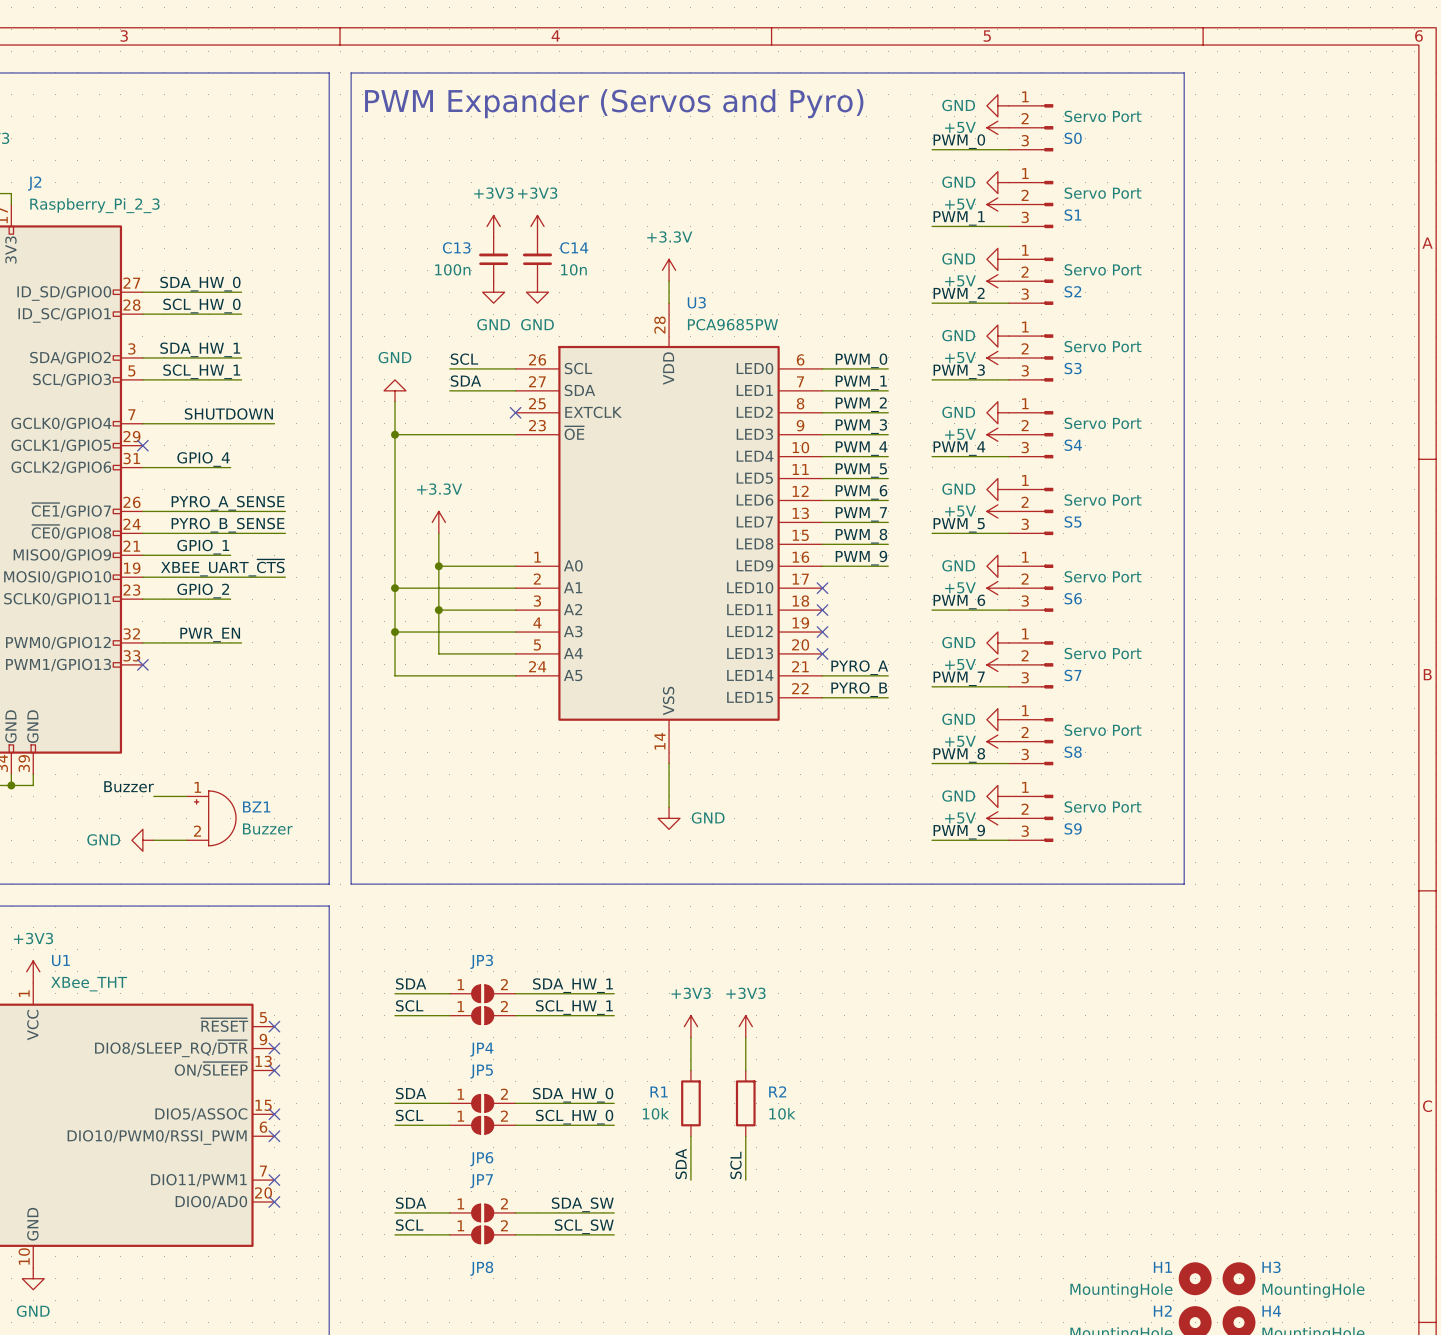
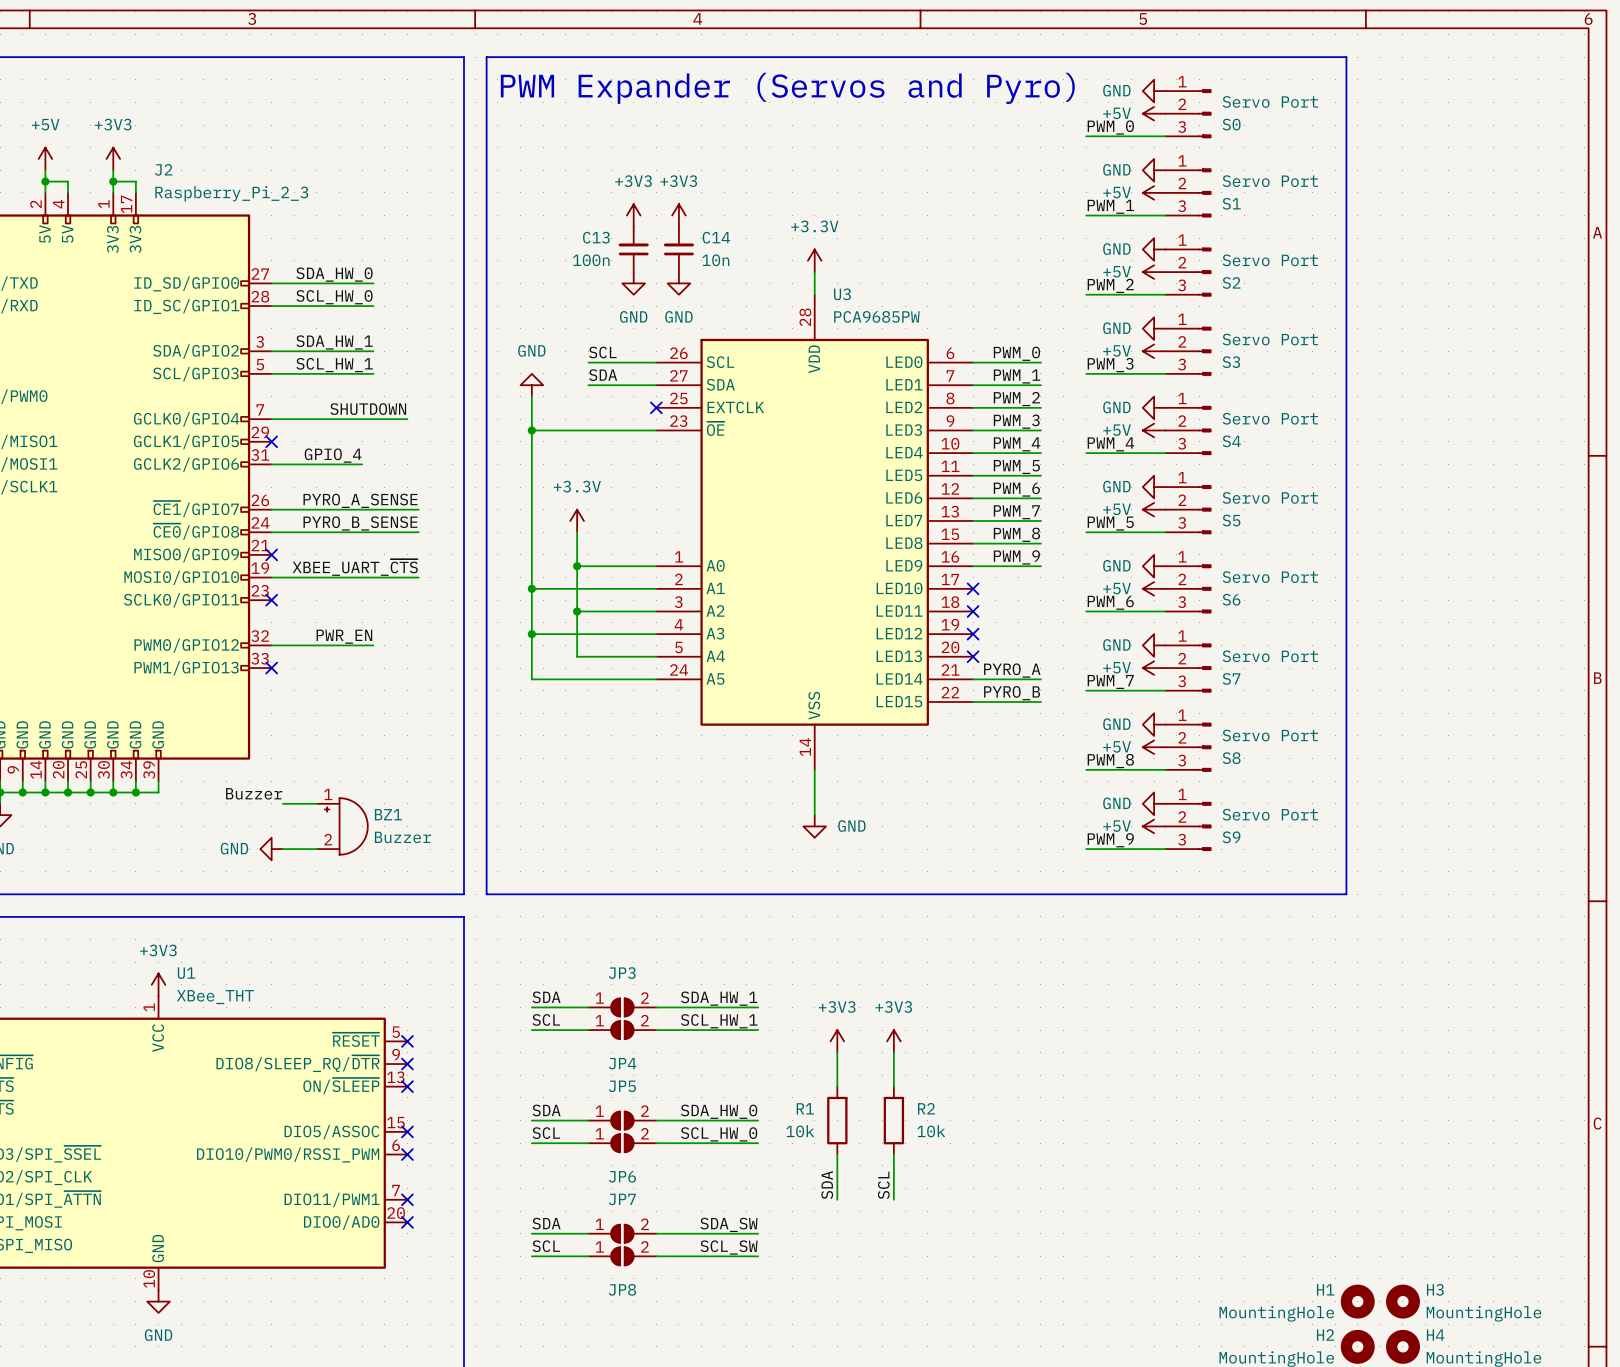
label: GPIO_1 (203, 547) -> none
wire: (142, 555) (230, 555) -> none
no-connect mark: none -> (271, 554)
label: GPIO_2 (203, 591) -> none
wire: (142, 599) (230, 599) -> none
no-connect mark: none -> (271, 600)

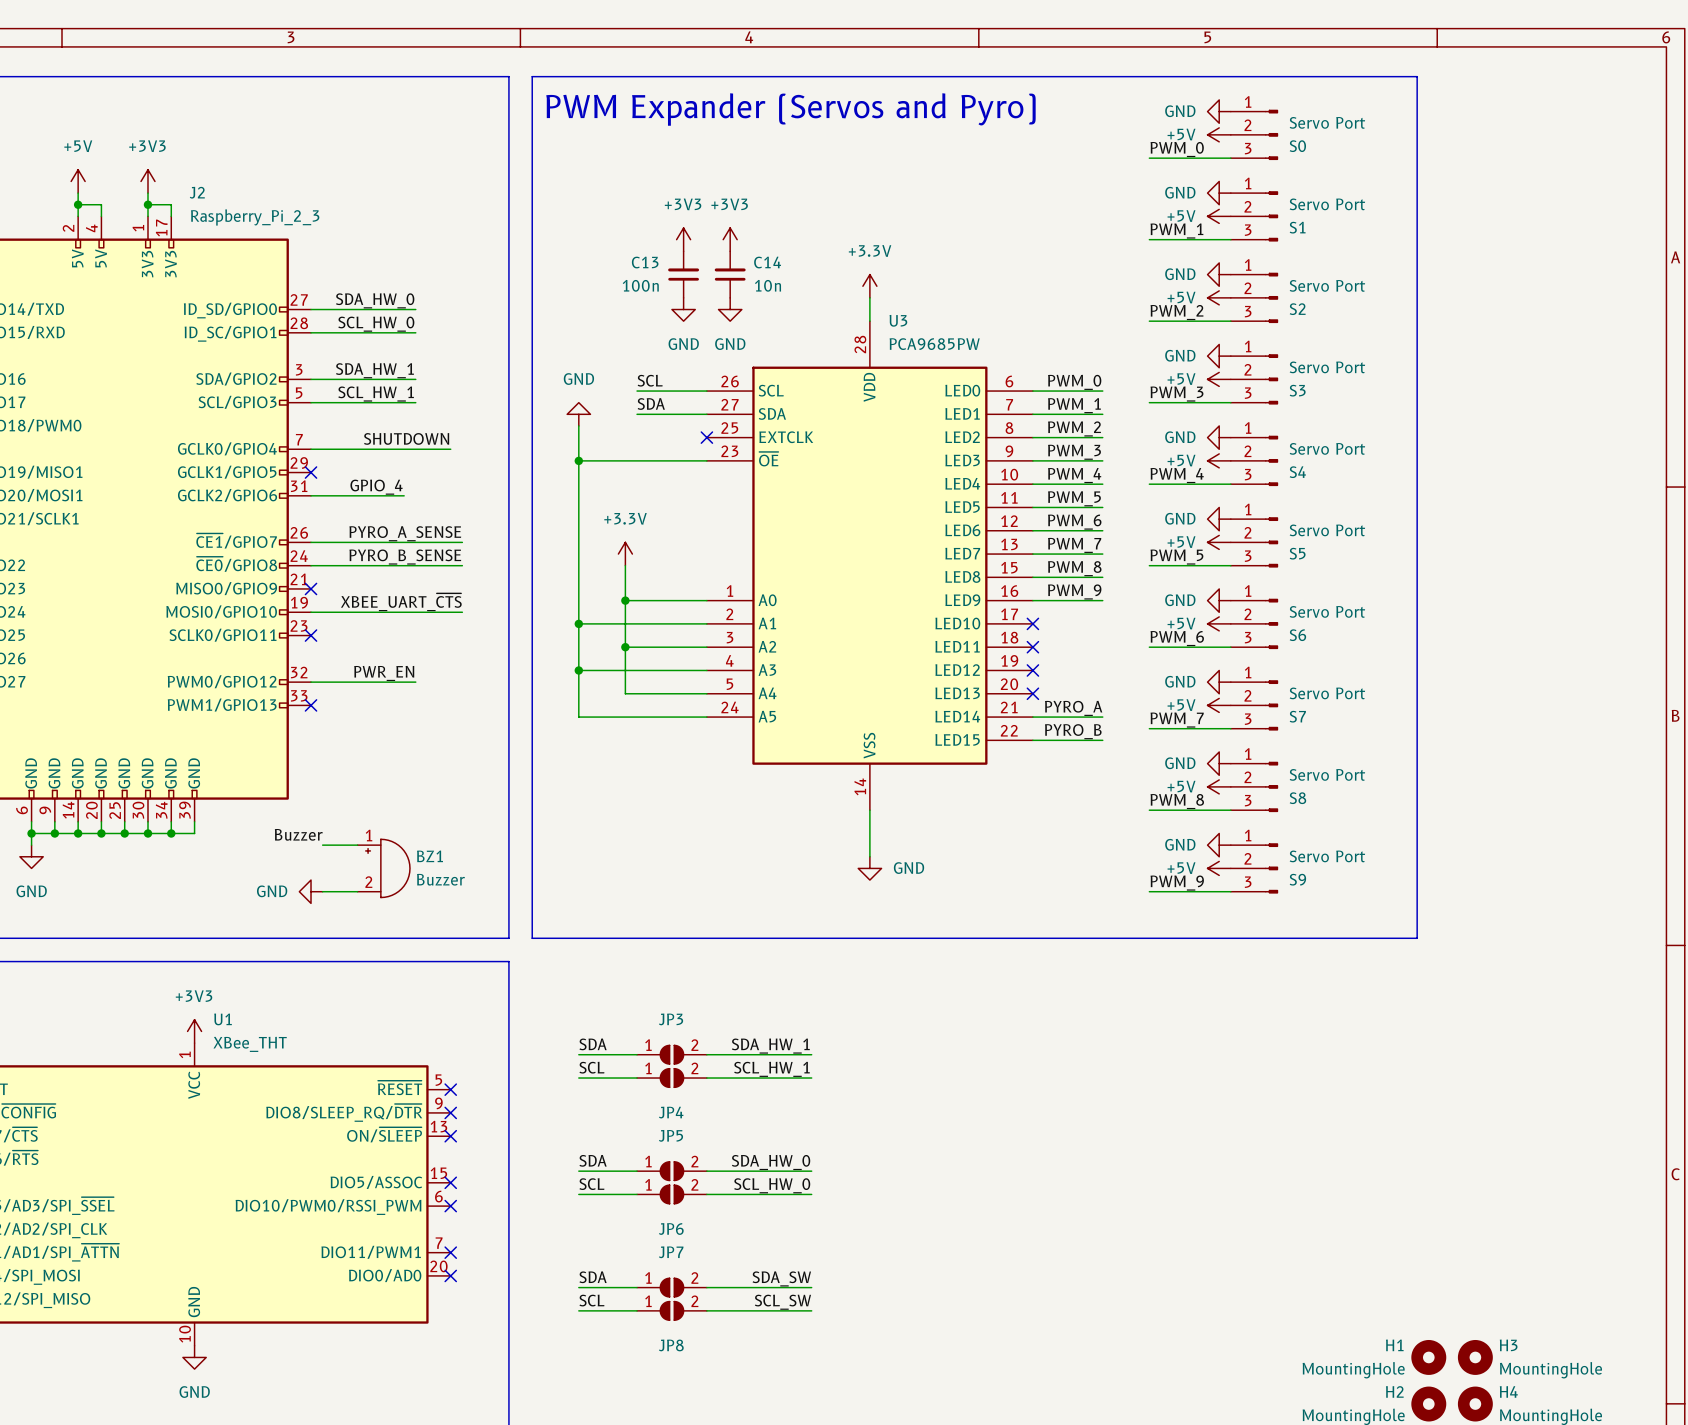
power symbol: +3V3 (837, 1041) -> none
power symbol: +3V3 (893, 1041) -> none
wire: (837, 1052) (837, 1086) -> none
wire: (893, 1052) (893, 1086) -> none
R1: 10k (837, 1120) -> none
R2: 10k (893, 1120) -> none
wire: (837, 1154) (837, 1199) -> none
wire: (893, 1154) (893, 1199) -> none
label: SDA (827, 1185) -> none
label: SCL (883, 1185) -> none

